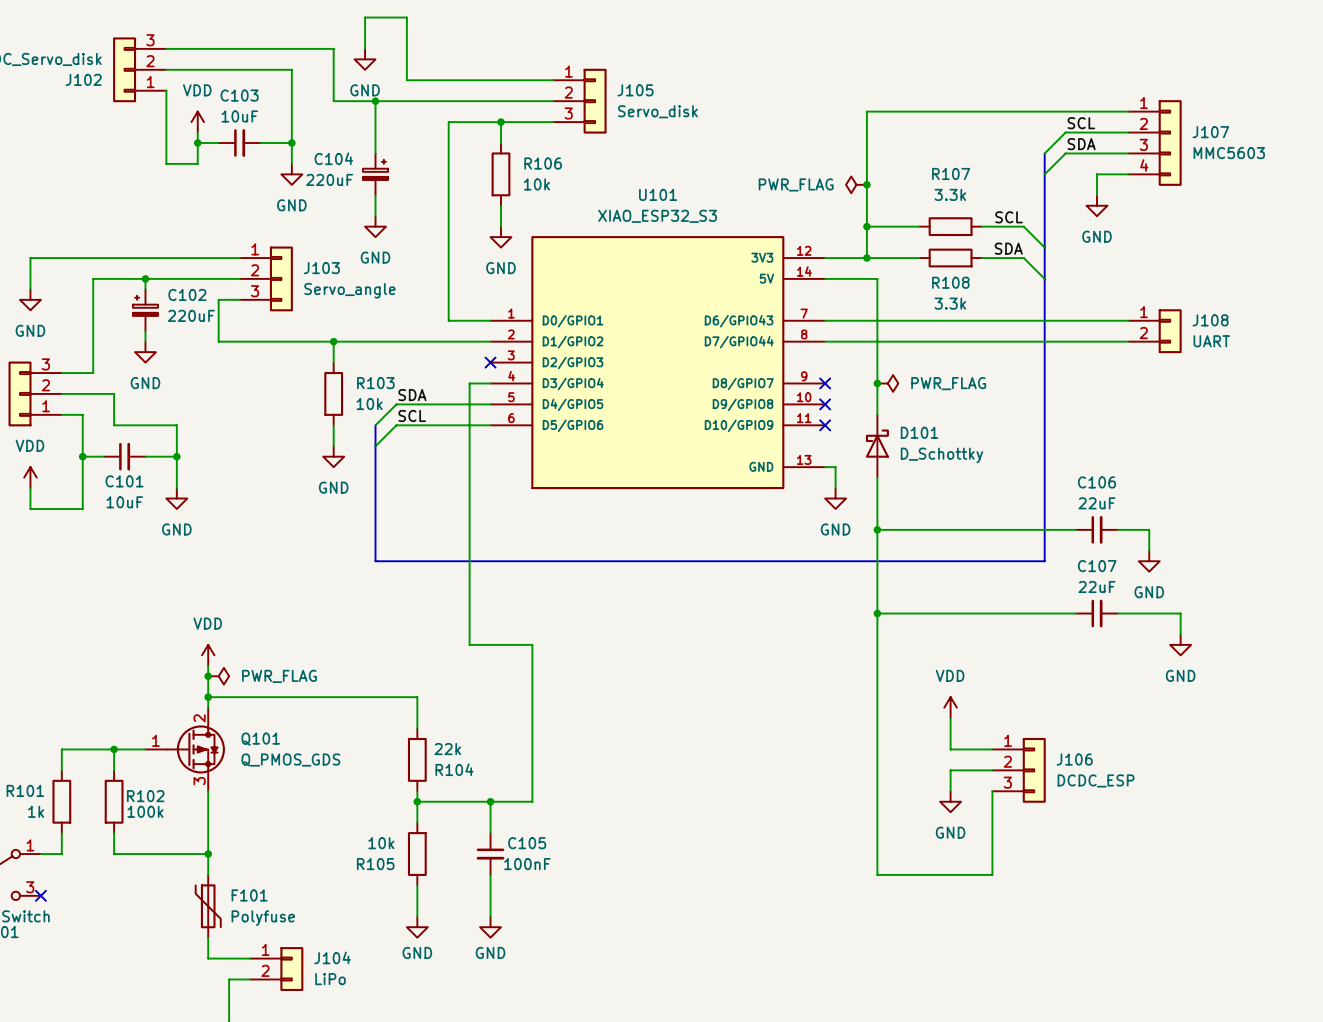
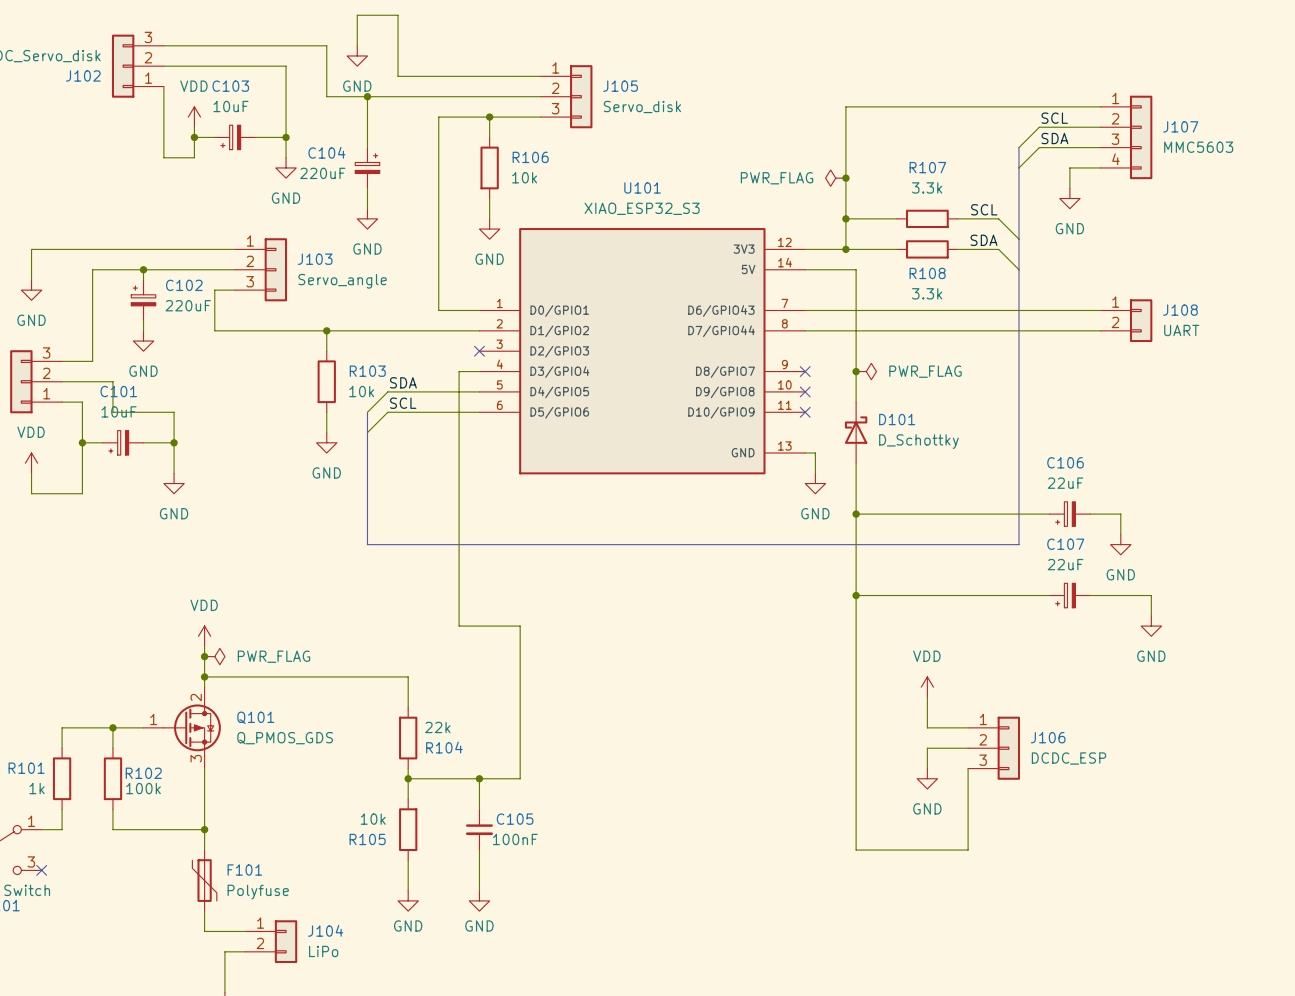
C103 symbol: [218, 129, 261, 157] -> [214, 125, 256, 150]
C101 symbol: [103, 442, 146, 471] -> [102, 430, 144, 456]
C101 name position: C101 (124, 481) -> C101 (118, 391)
C101 value position: 10uF (124, 502) -> 10uF (119, 411)
C106 symbol: [1076, 515, 1118, 544] -> [1049, 501, 1091, 527]
C107 symbol: [1076, 599, 1118, 628] -> [1049, 583, 1091, 608]

